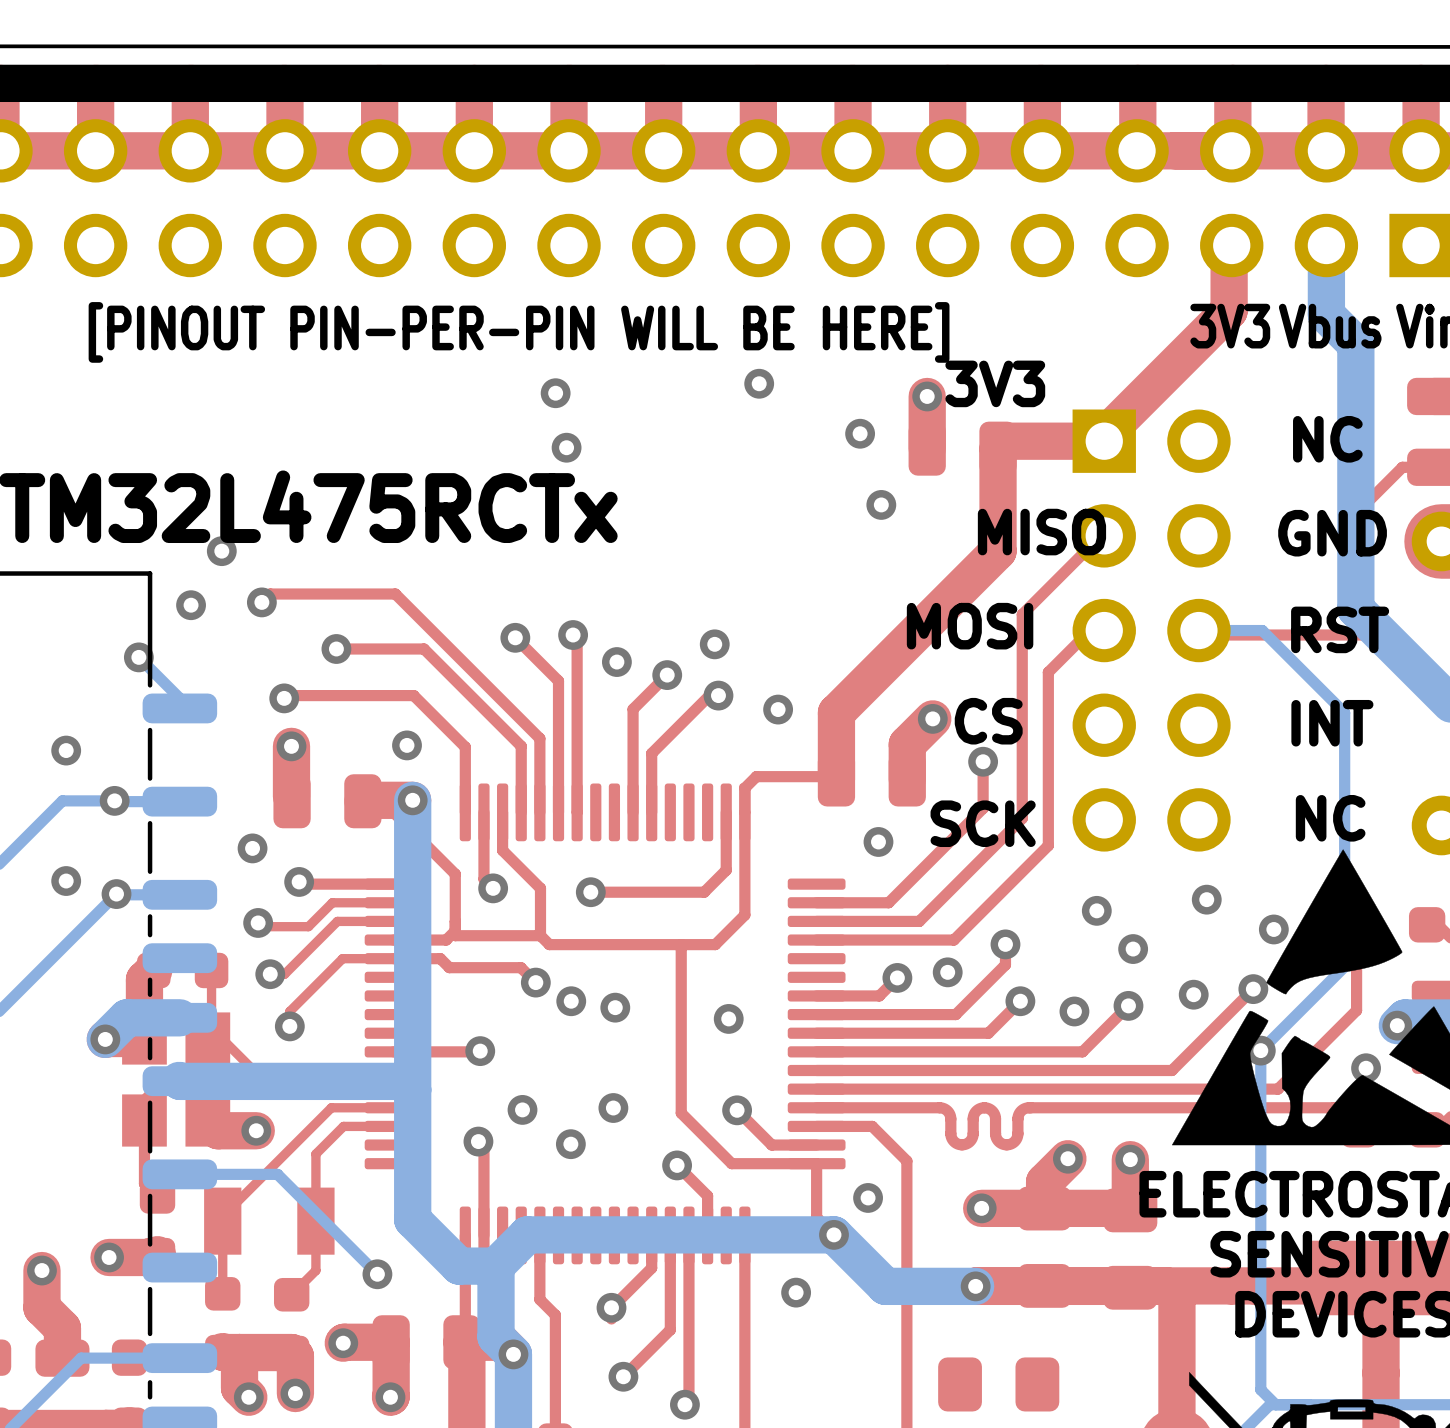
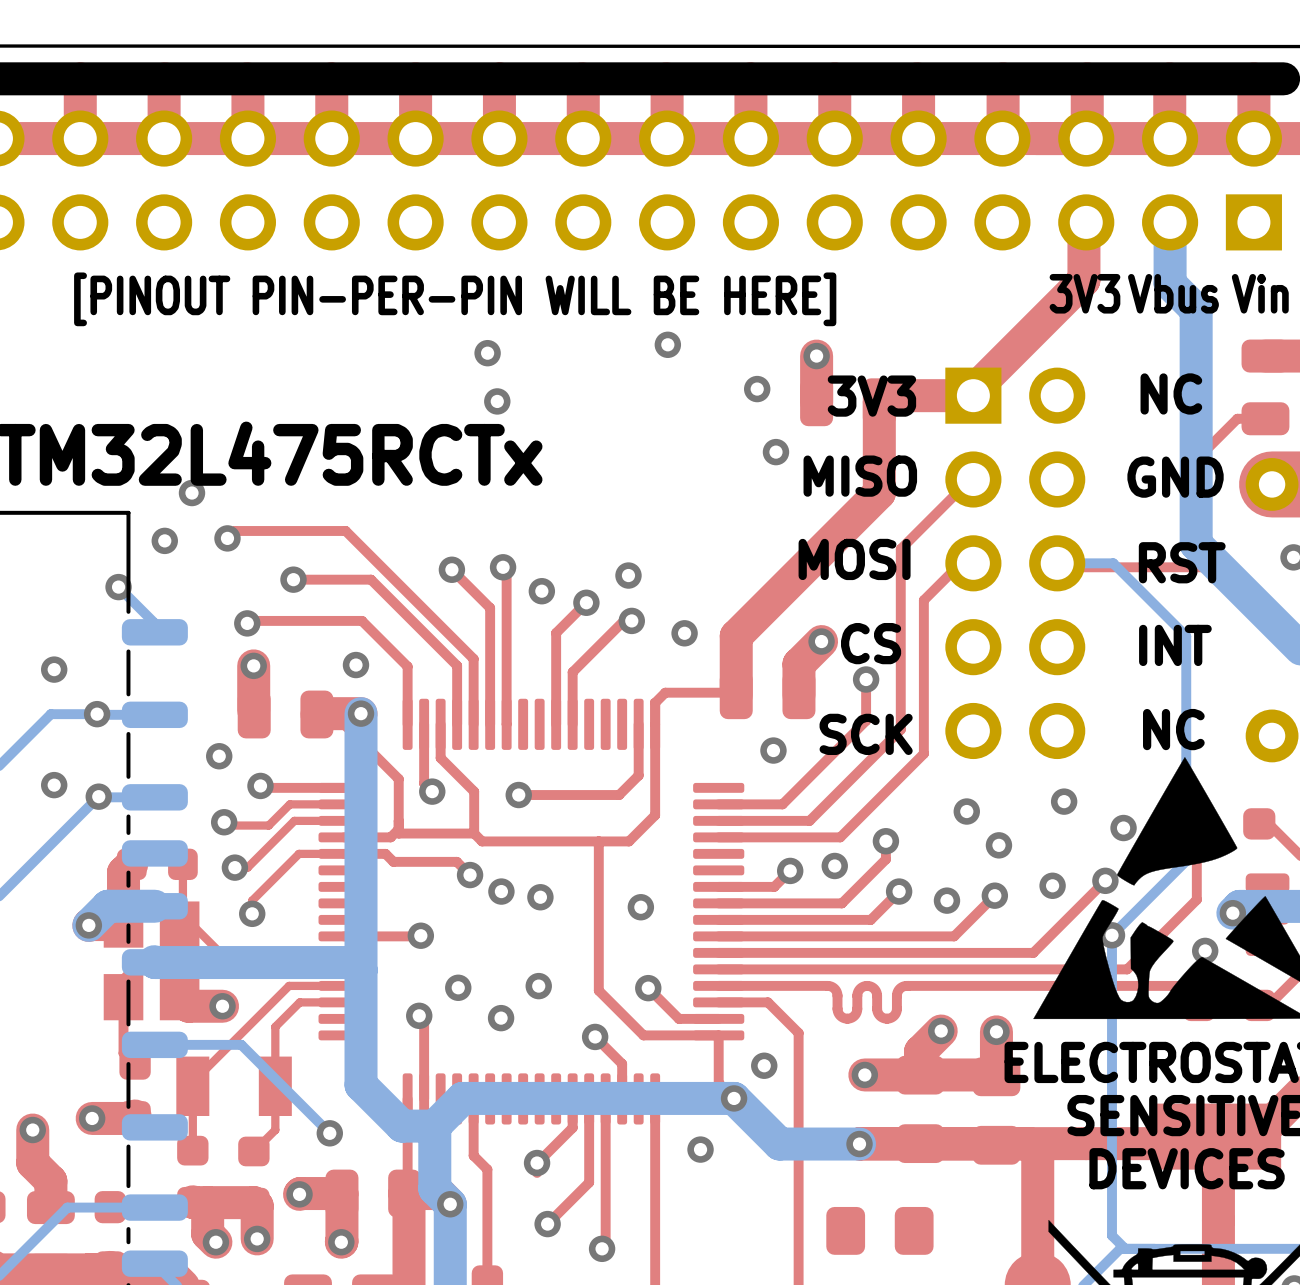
text position: 3V3 (995, 383) -> 3V3 (871, 396)
text position: MISO (1041, 532) -> MISO (860, 476)

